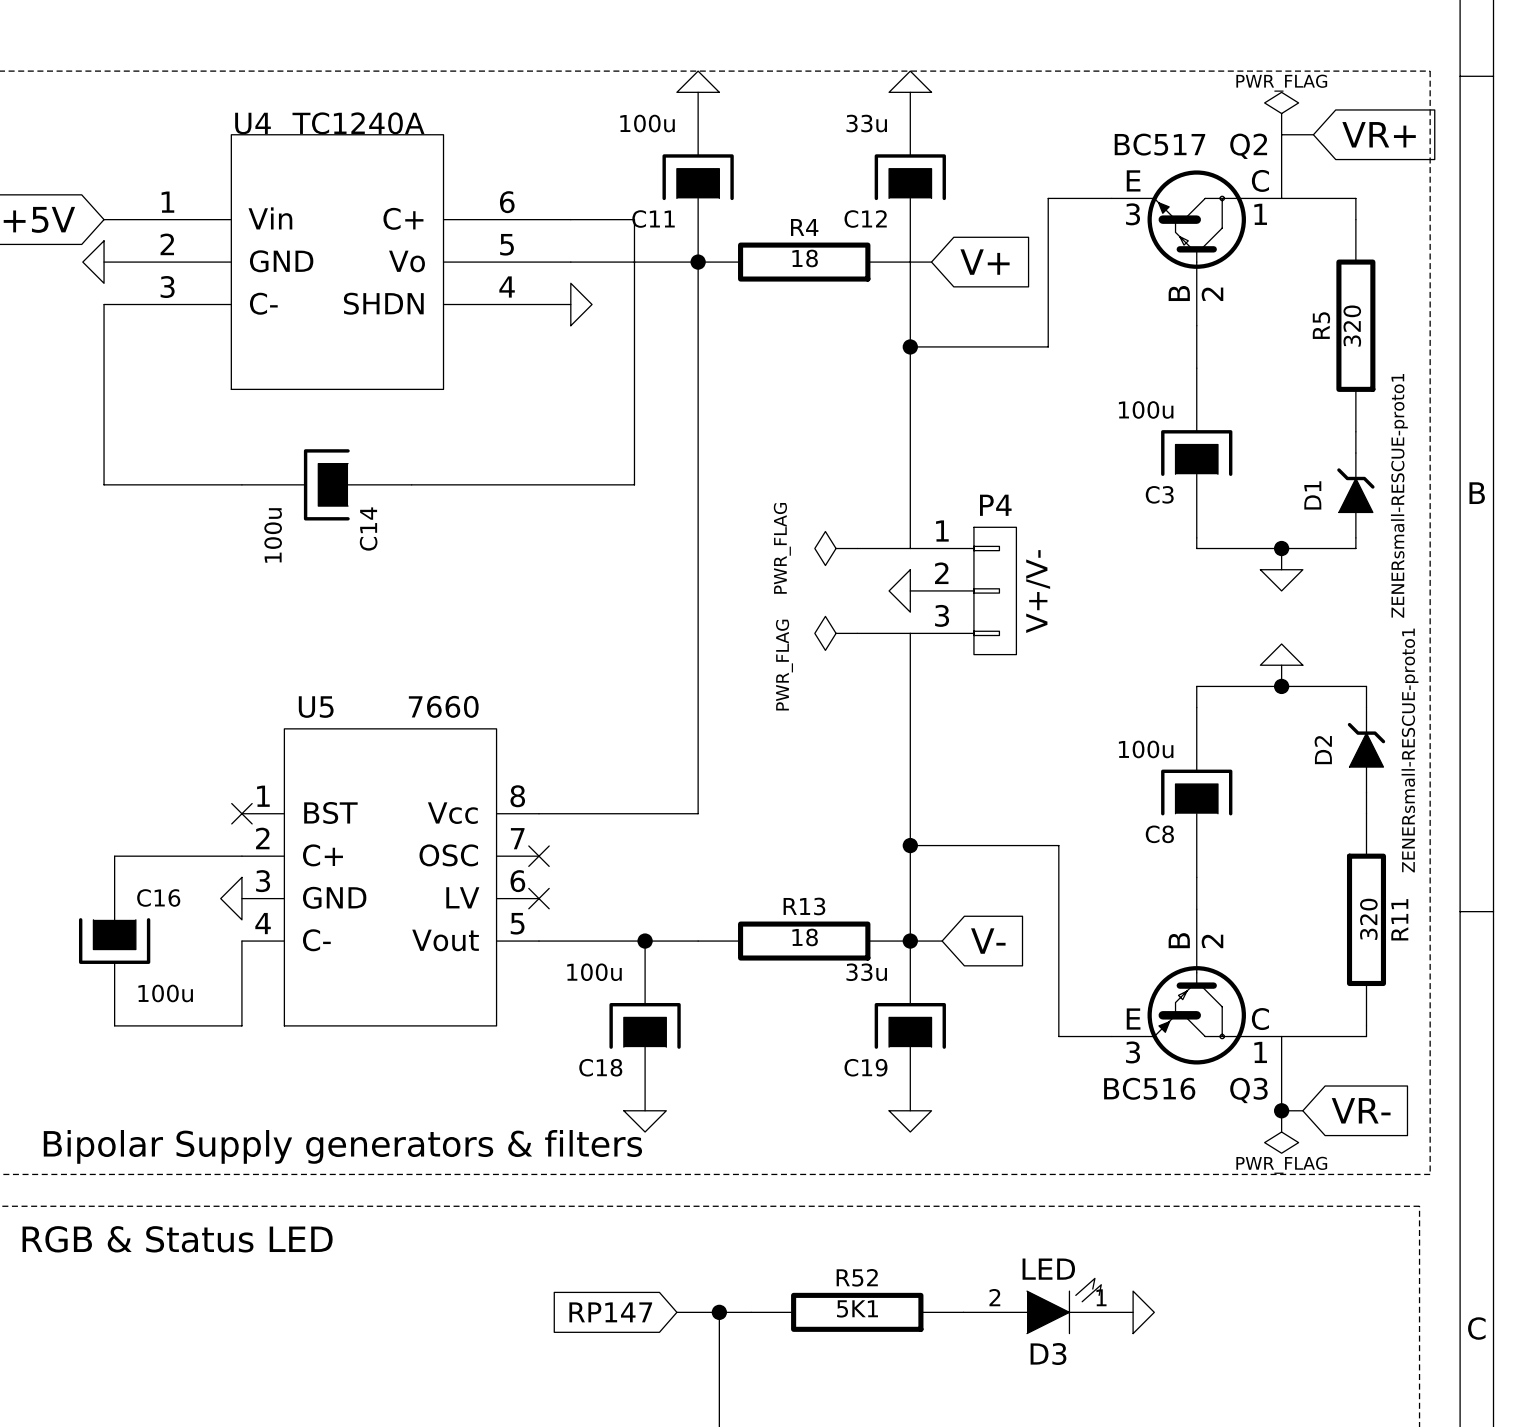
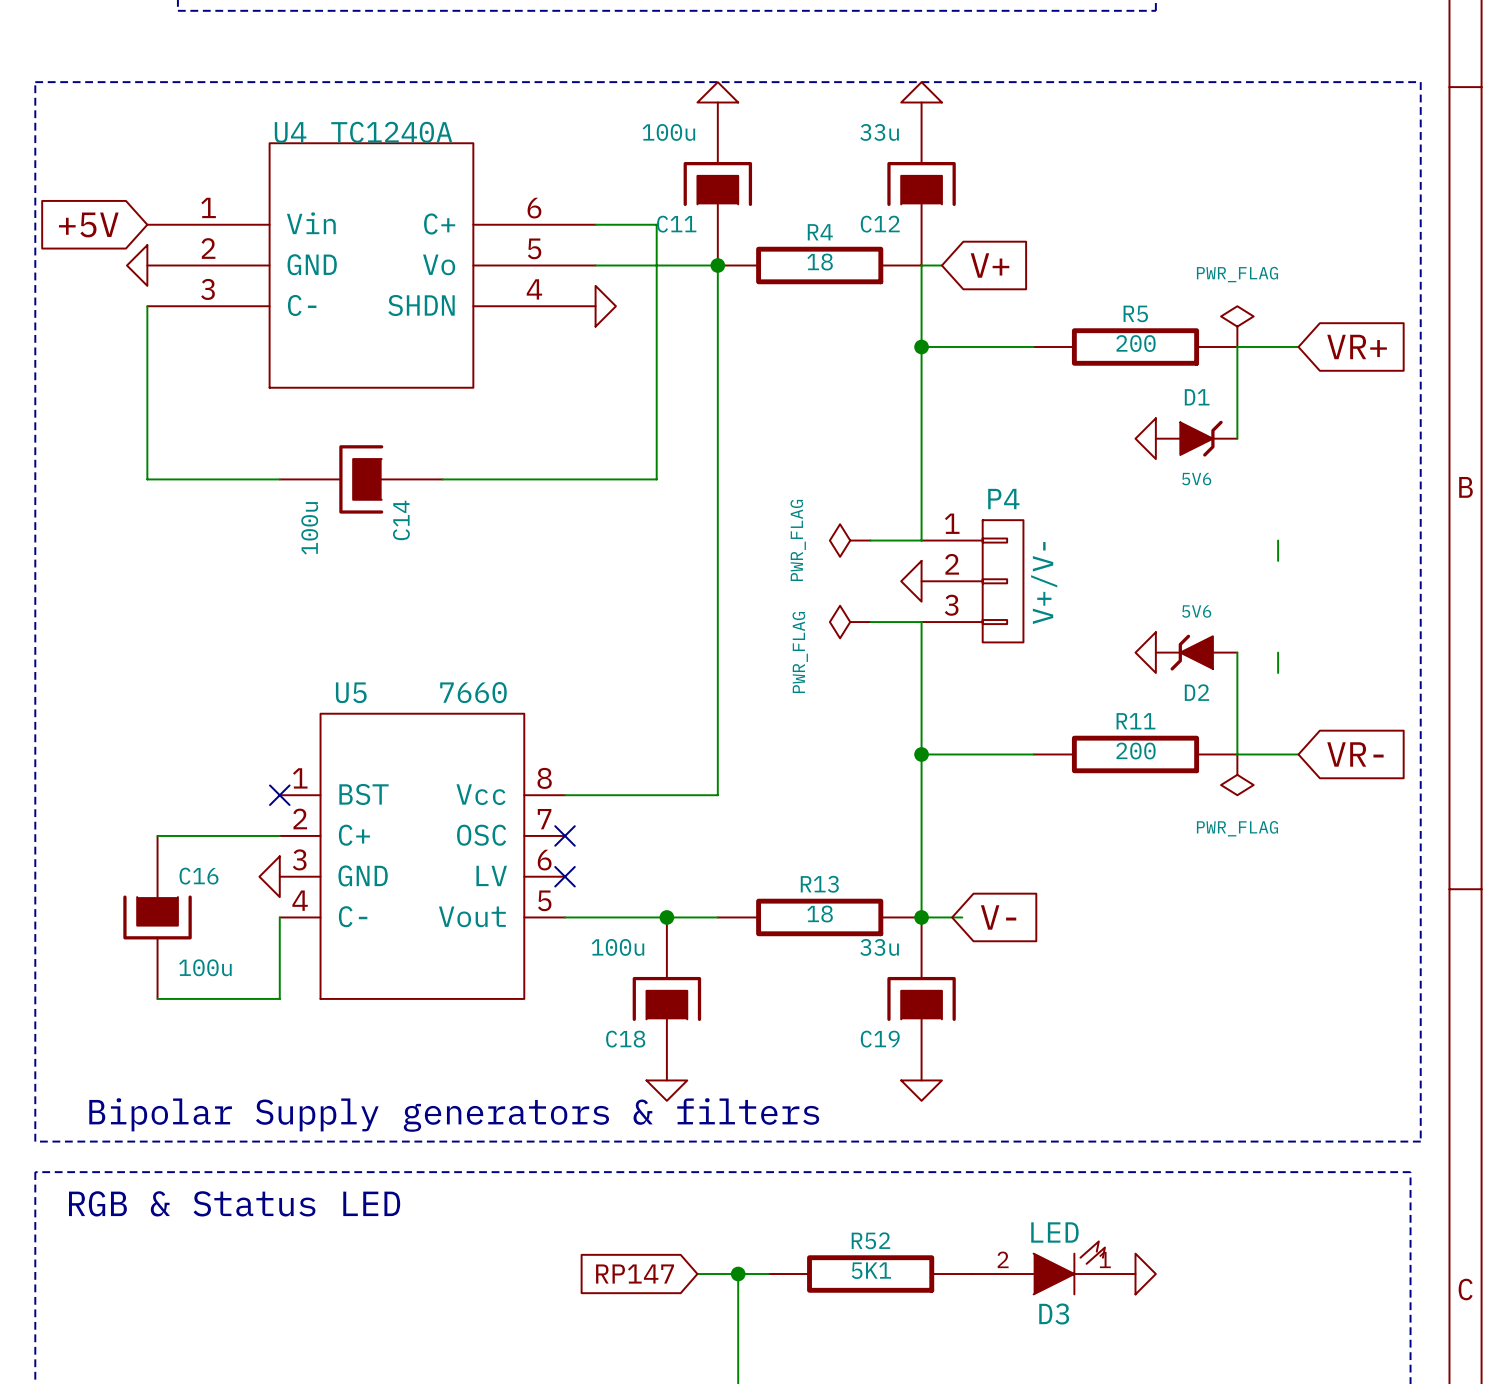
power symbol text position: PWR_FLAG (1281, 83) -> PWR_FLAG (1237, 274)
power symbol position: PWR_FLAG (1281, 113) -> PWR_FLAG (1237, 326)
wire: (1313, 134) (1281, 134) (1281, 198) (1355, 198) (1355, 219) -> none
global label position: VR+ (1379, 134) -> VR+ (1357, 346)
wire: (1111, 198) (1048, 198) (1048, 346) (1027, 346) -> none
Q2: BC517 (1196, 248) -> none
R5 rotation: 0° (1355, 325) -> 90° clockwise (1135, 346)
R5 position: (1355, 325) -> (1135, 346)
R5 value: 320 (1352, 326) -> 200 (1136, 343)
wire: none -> (1298, 346) (1237, 346) (1237, 438)
wire: (1355, 431) (1355, 453) -> none
power symbol: none -> (1145, 438)
C3: 100u (1196, 453) -> none
D1 rotation: 0° (1355, 490) -> 90° clockwise (1201, 438)
D1 position: (1355, 495) -> (1196, 438)
D1 value: ZENERsmall-RESCUE-proto1 (1399, 495) -> 5V6 (1196, 479)
wire: (1196, 537) (1196, 548) (1355, 548) (1355, 537) -> none
junction: (1281, 548) -> none
power symbol: (1281, 580) -> none
power symbol: (1281, 654) -> none
power symbol: none -> (1145, 652)
wire: none -> (1237, 652) (1237, 754) (1298, 754)
junction: (1281, 686) -> none
wire: (1196, 707) (1196, 686) (1366, 686) (1366, 707) -> none
D2 rotation: 0° (1366, 744) -> 90° counterclockwise (1191, 652)
D2 position: (1366, 750) -> (1196, 652)
D2 value: ZENERsmall-RESCUE-proto1 (1410, 750) -> 5V6 (1196, 611)
wire: none -> (921, 754) (1033, 754)
C8: 100u (1196, 792) -> none
power symbol: none -> PWR_FLAG (1237, 774)
wire: (1366, 792) (1366, 813) -> none
wire: (910, 845) (1058, 845) (1058, 1036) (1111, 1036) -> none
junction position: (910, 845) -> (921, 754)
wire: (1196, 877) (1196, 909) -> none
R11 rotation: 0° (1366, 919) -> 90° clockwise (1135, 754)
R11 position: (1366, 919) -> (1135, 754)
R11 value: 320 (1368, 919) -> 200 (1136, 751)
R11 name position: R11 (1399, 919) -> R11 (1135, 721)
wire: none -> (952, 917) (962, 917)
Q3: BC516 (1196, 986) -> none
wire: (1366, 1025) (1366, 1036) (1281, 1036) (1281, 1110) (1302, 1110) -> none
junction: (1281, 1110) -> none
global label position: VR- (1361, 1110) -> VR- (1355, 754)
power symbol: PWR_FLAG (1281, 1132) -> none

